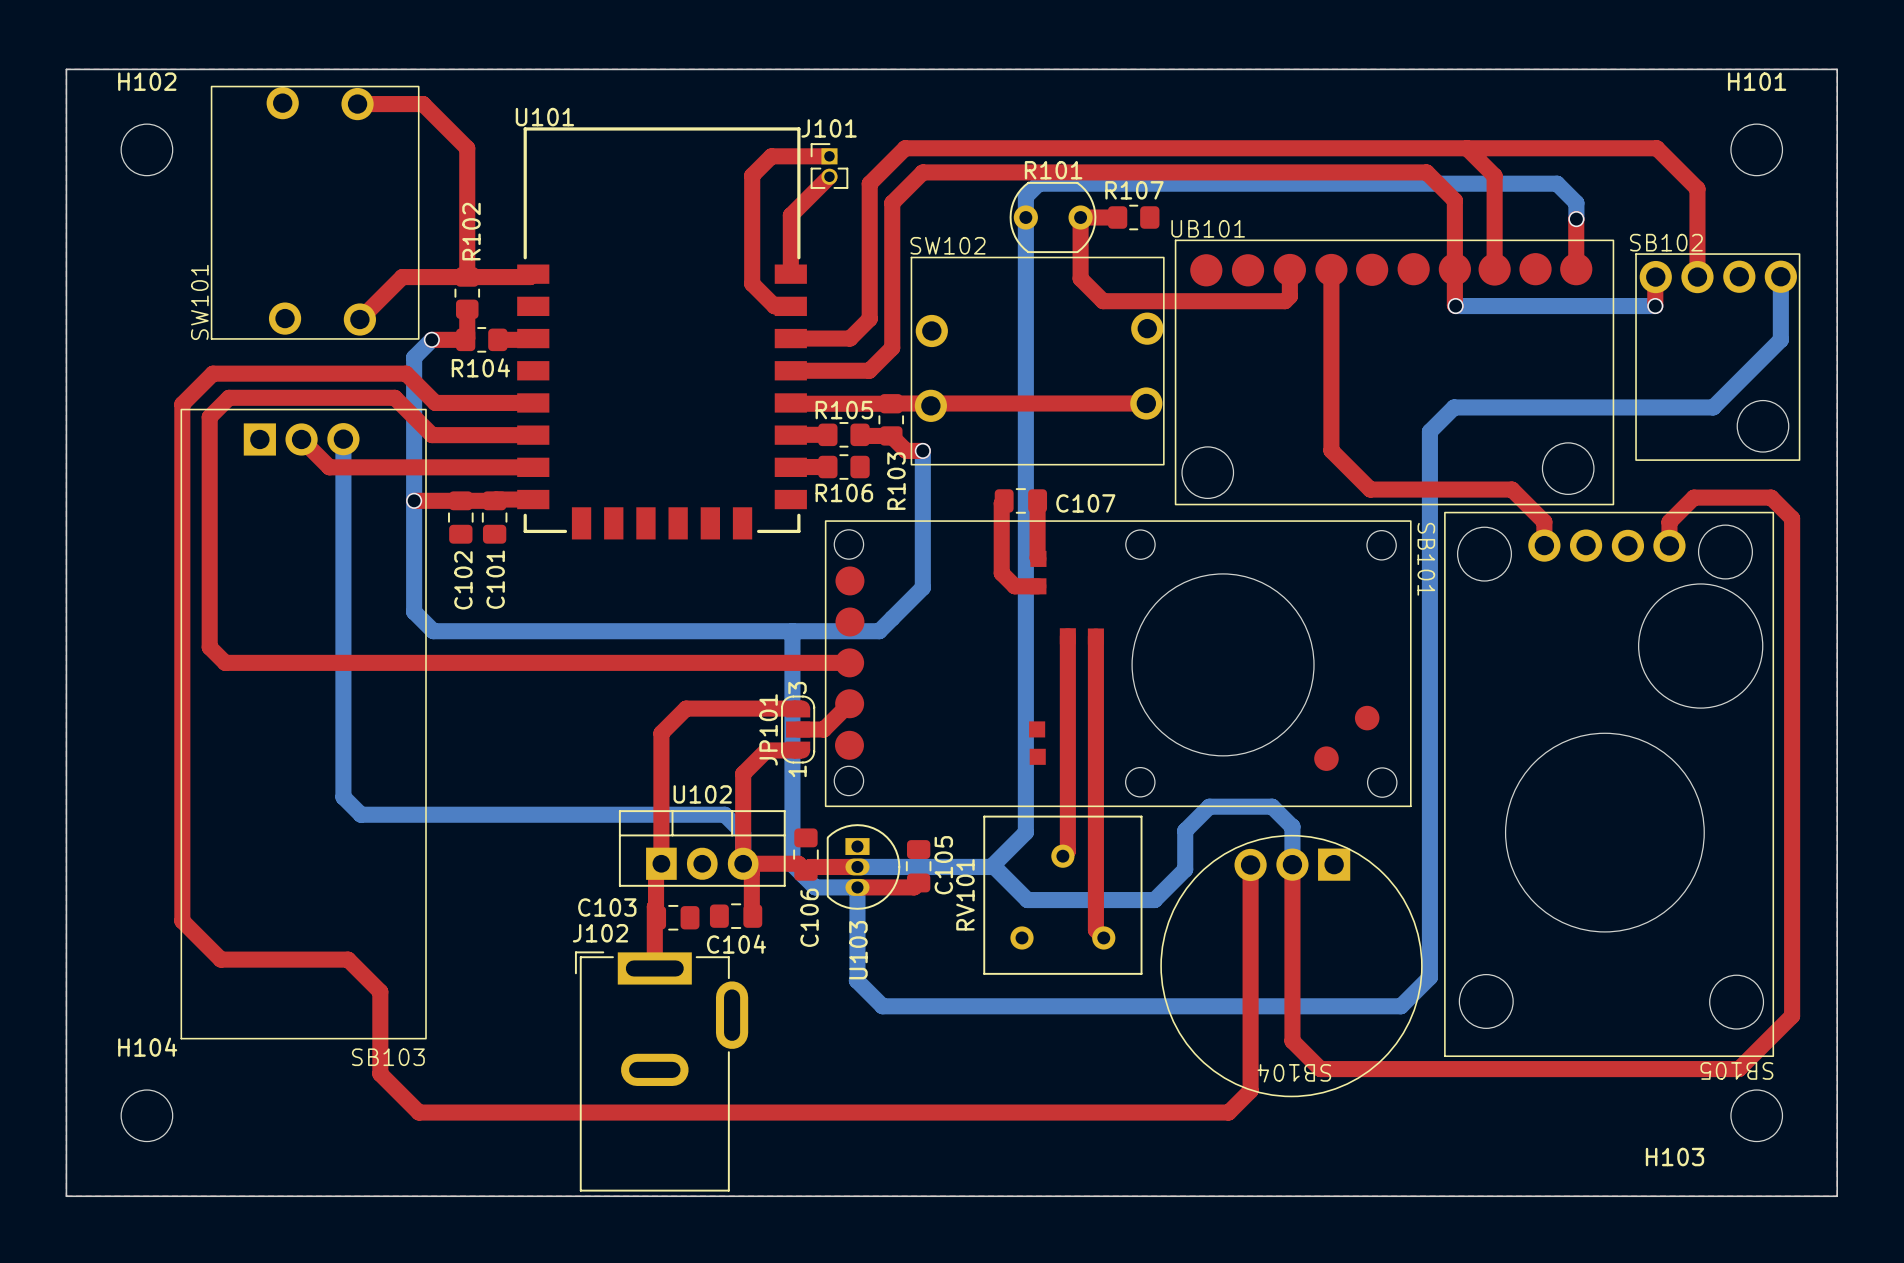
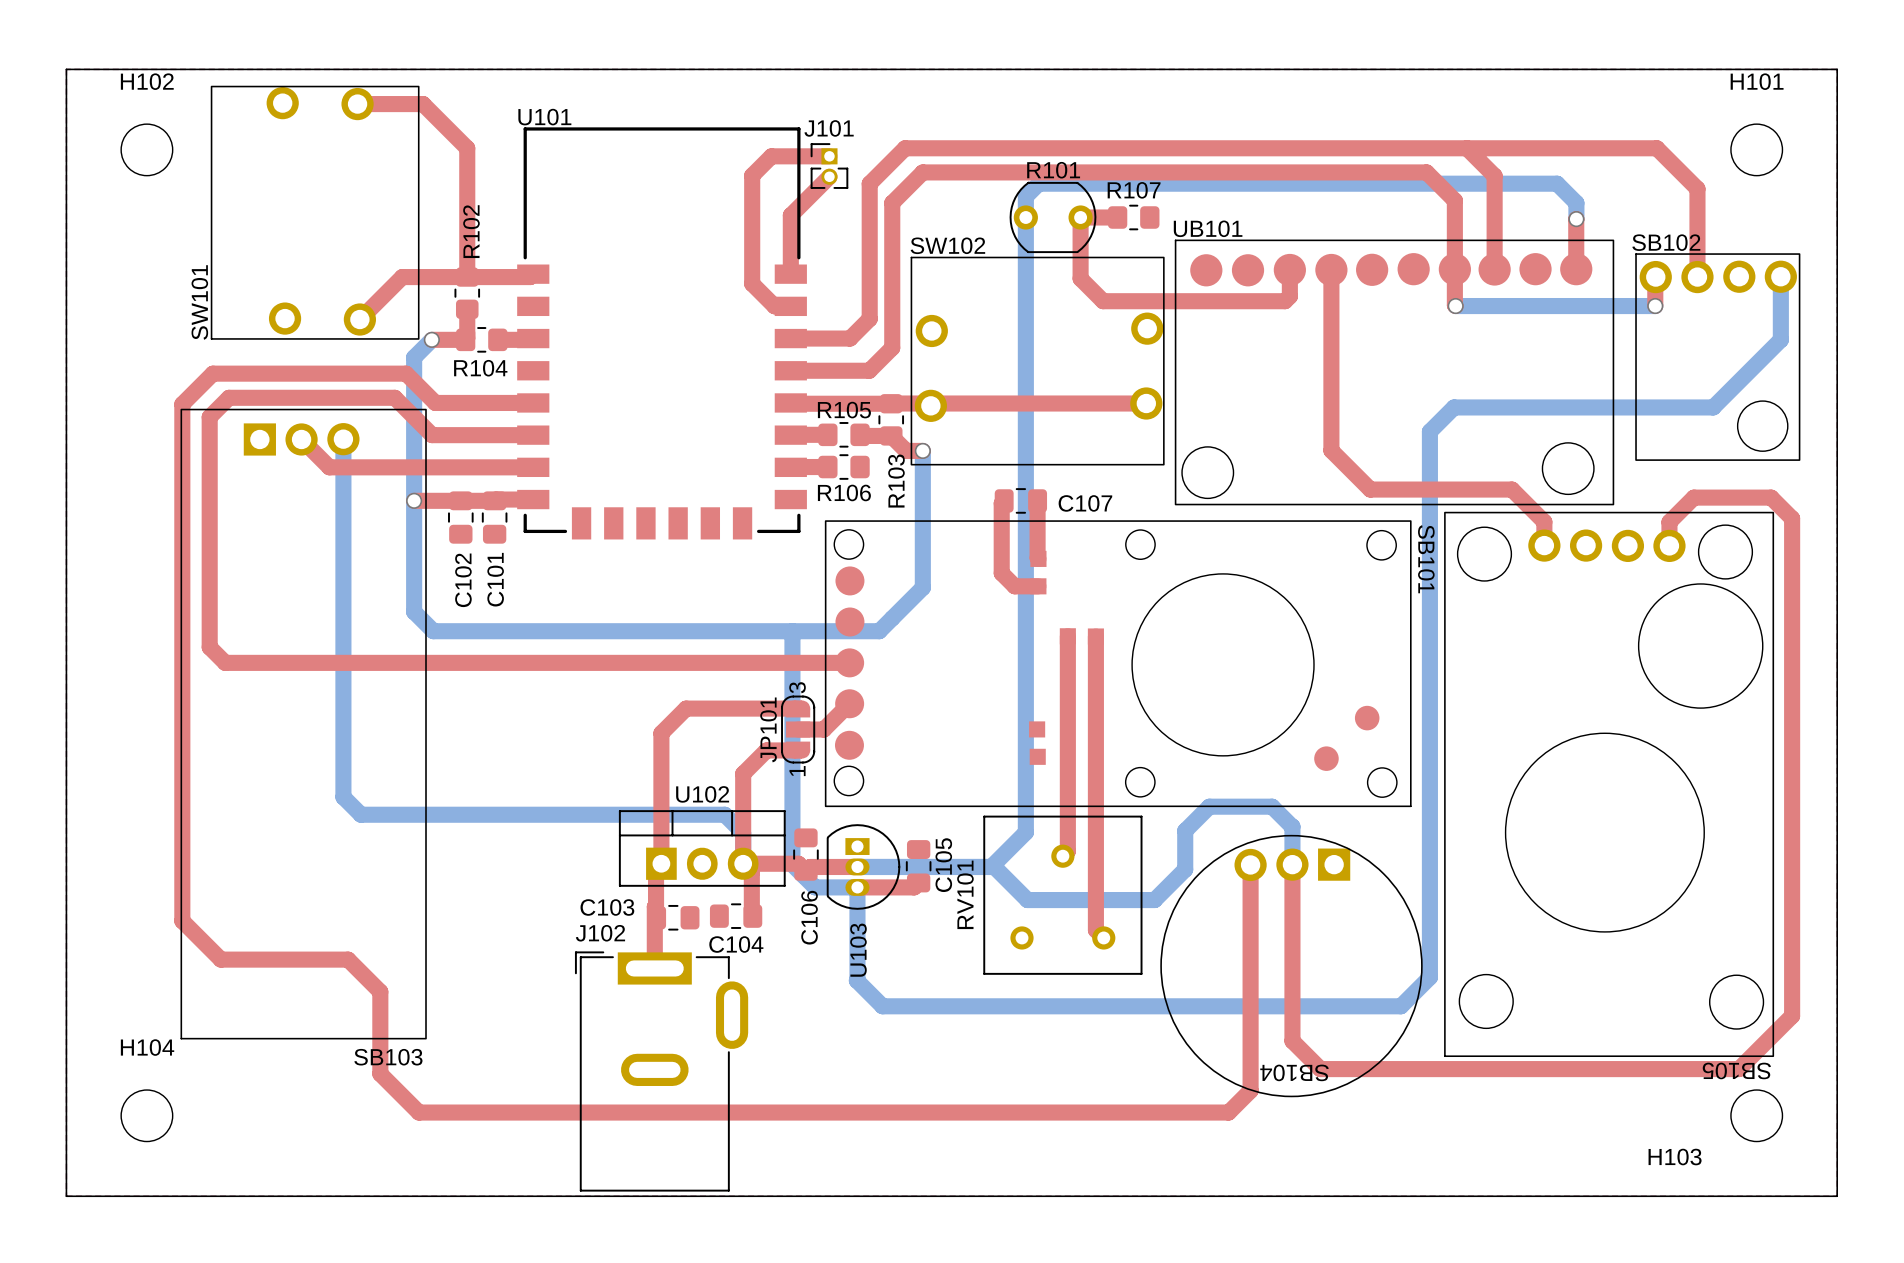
SB102 footprint: [1635, 253, 1801, 461] -> [1635, 253, 1801, 461]

